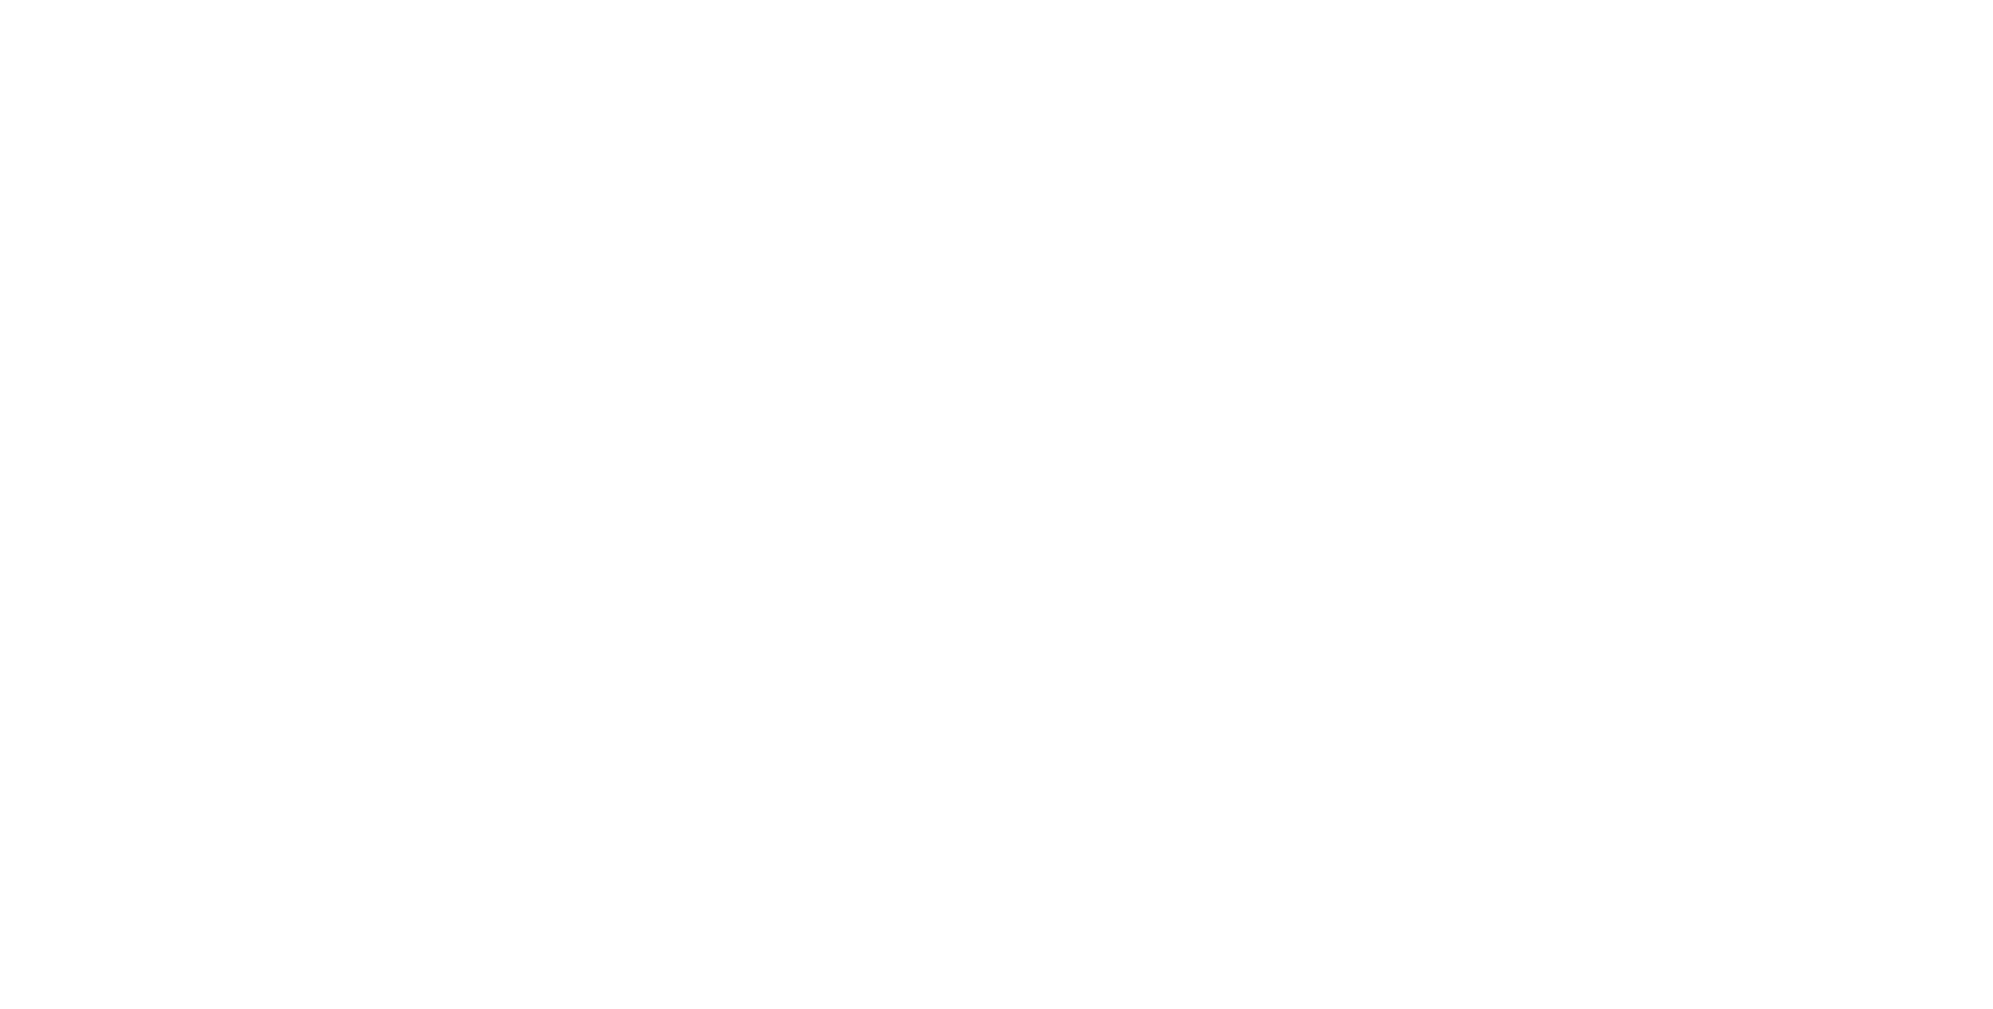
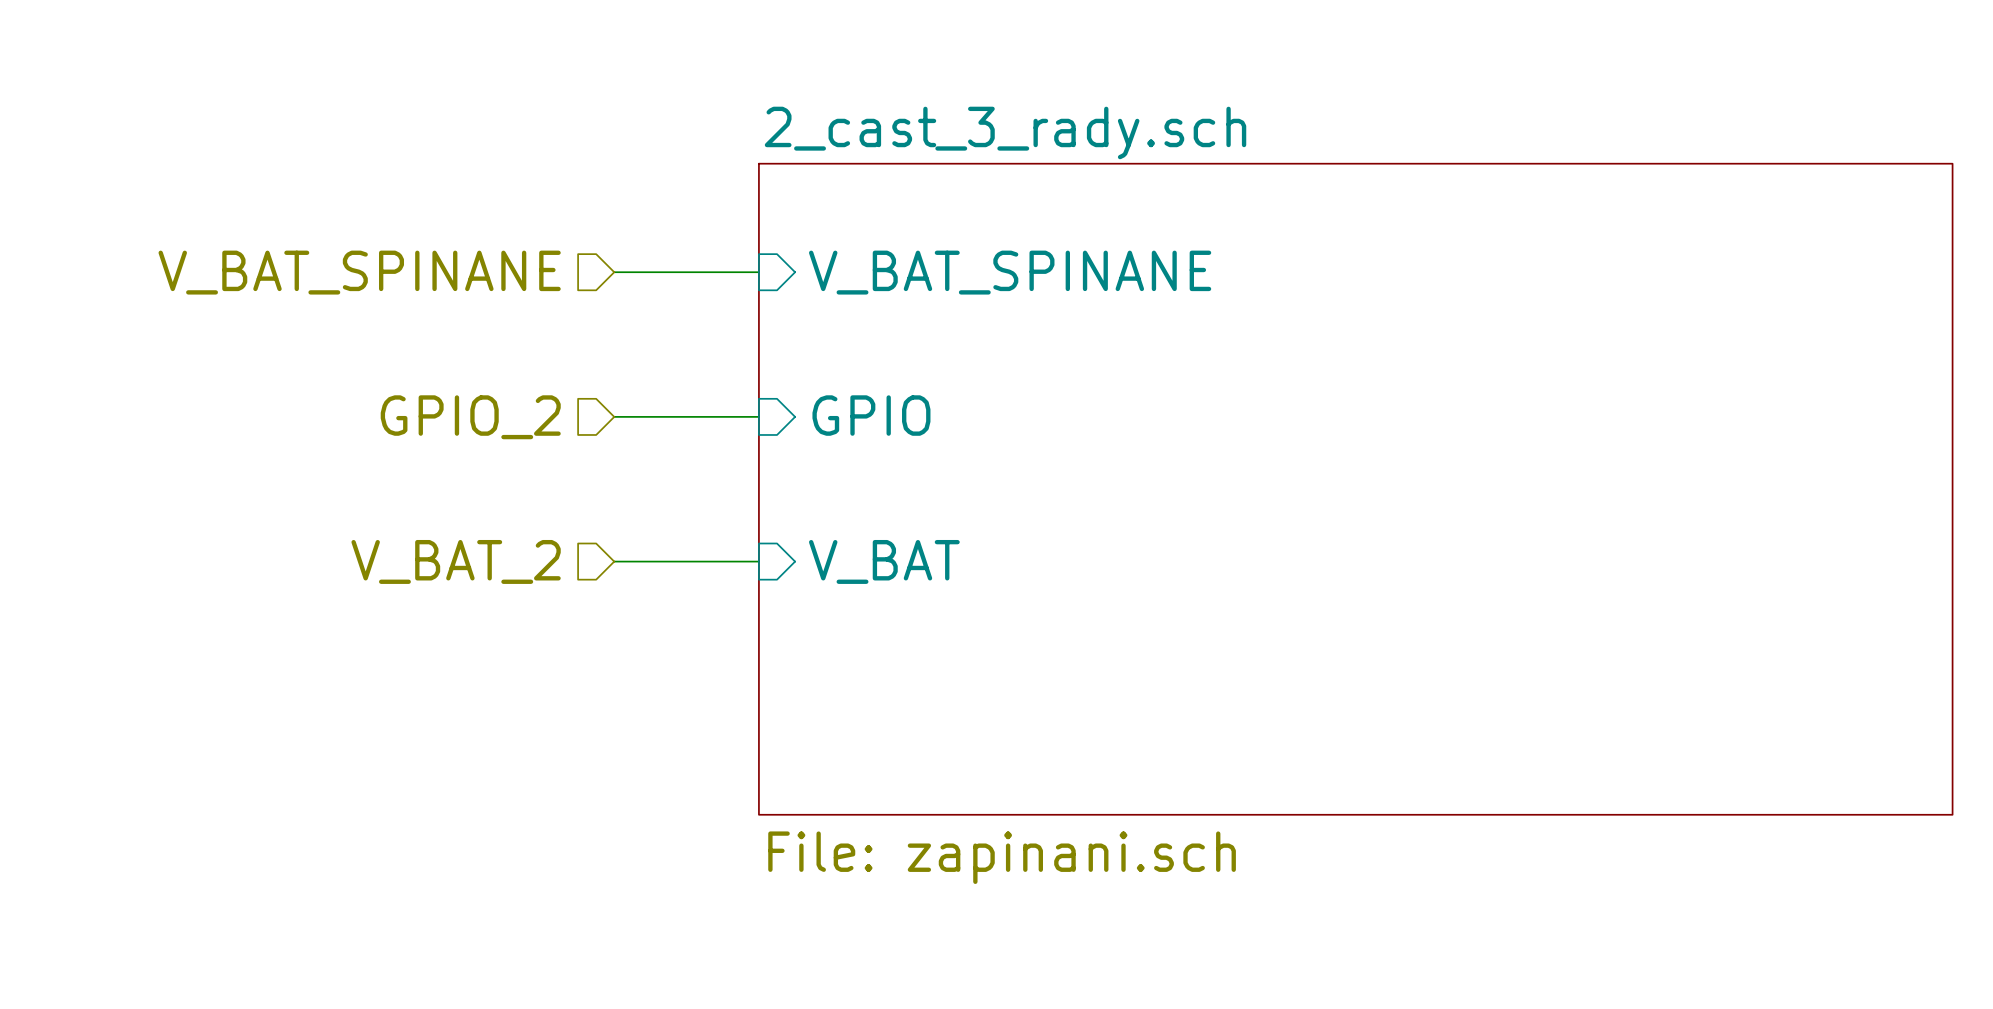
hierarchical label: none -> V_BAT_SPINANE (359, 272)
wire: none -> (614, 272) (758, 272)
sheet pin: none -> V_BAT_SPINANE (1010, 272)
sheet pin: none -> GPIO (871, 415)
wire: none -> (614, 416) (758, 416)
hierarchical label: none -> GPIO_2 (470, 417)
sheet 2_cast_3_rady.sch: none -> File: zapinani.sch (1355, 489)
hierarchical label: none -> V_BAT_2 (456, 561)
wire: none -> (614, 561) (758, 561)
sheet pin: none -> V_BAT (884, 561)

